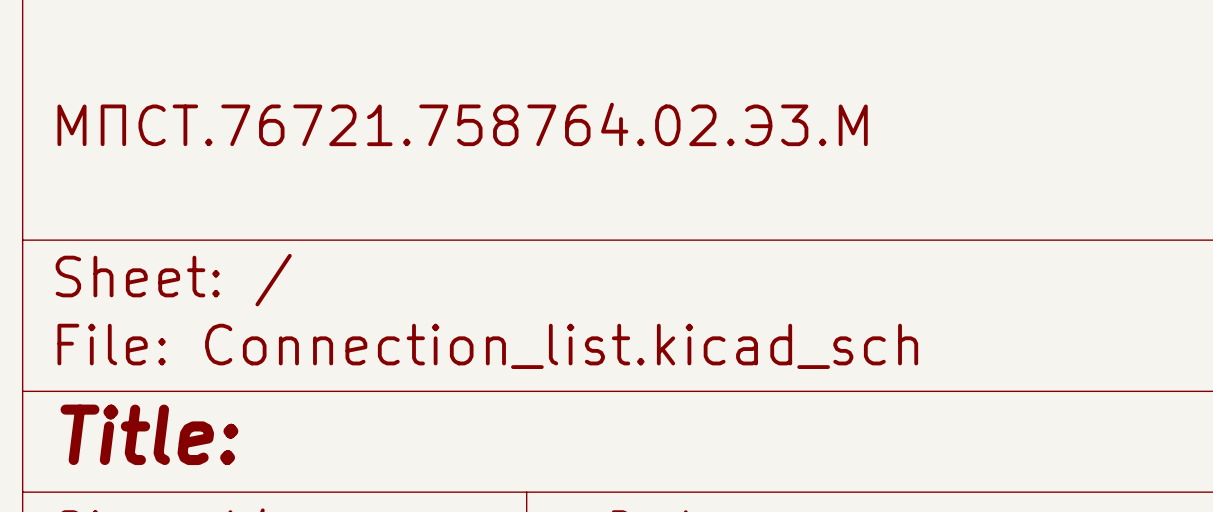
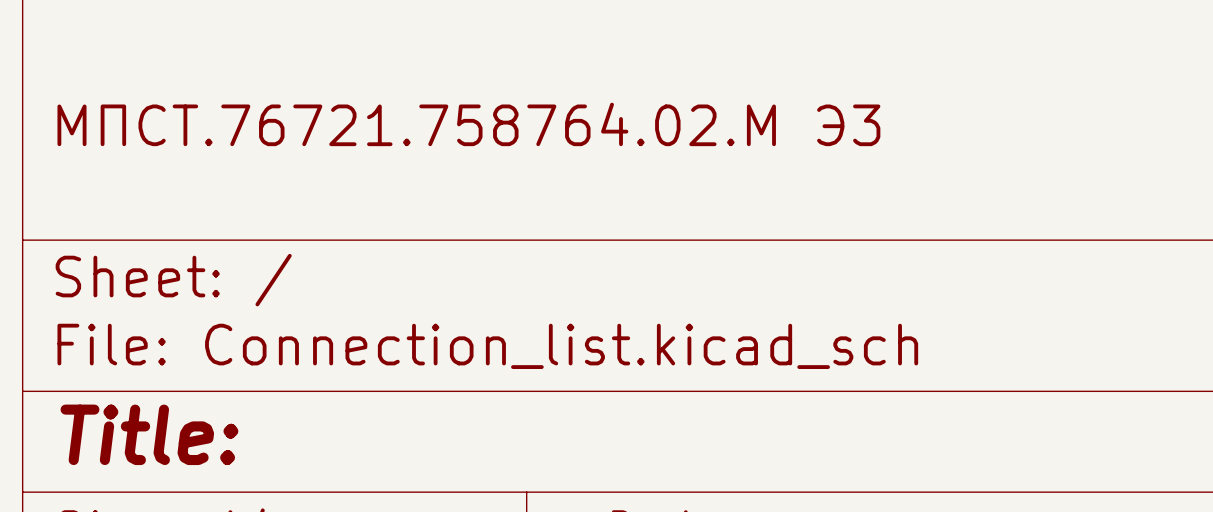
title block: МПСТ.76721.758764.02.Э3.М (462, 124) -> МПСТ.76721.758764.02.М Э3 (468, 124)

